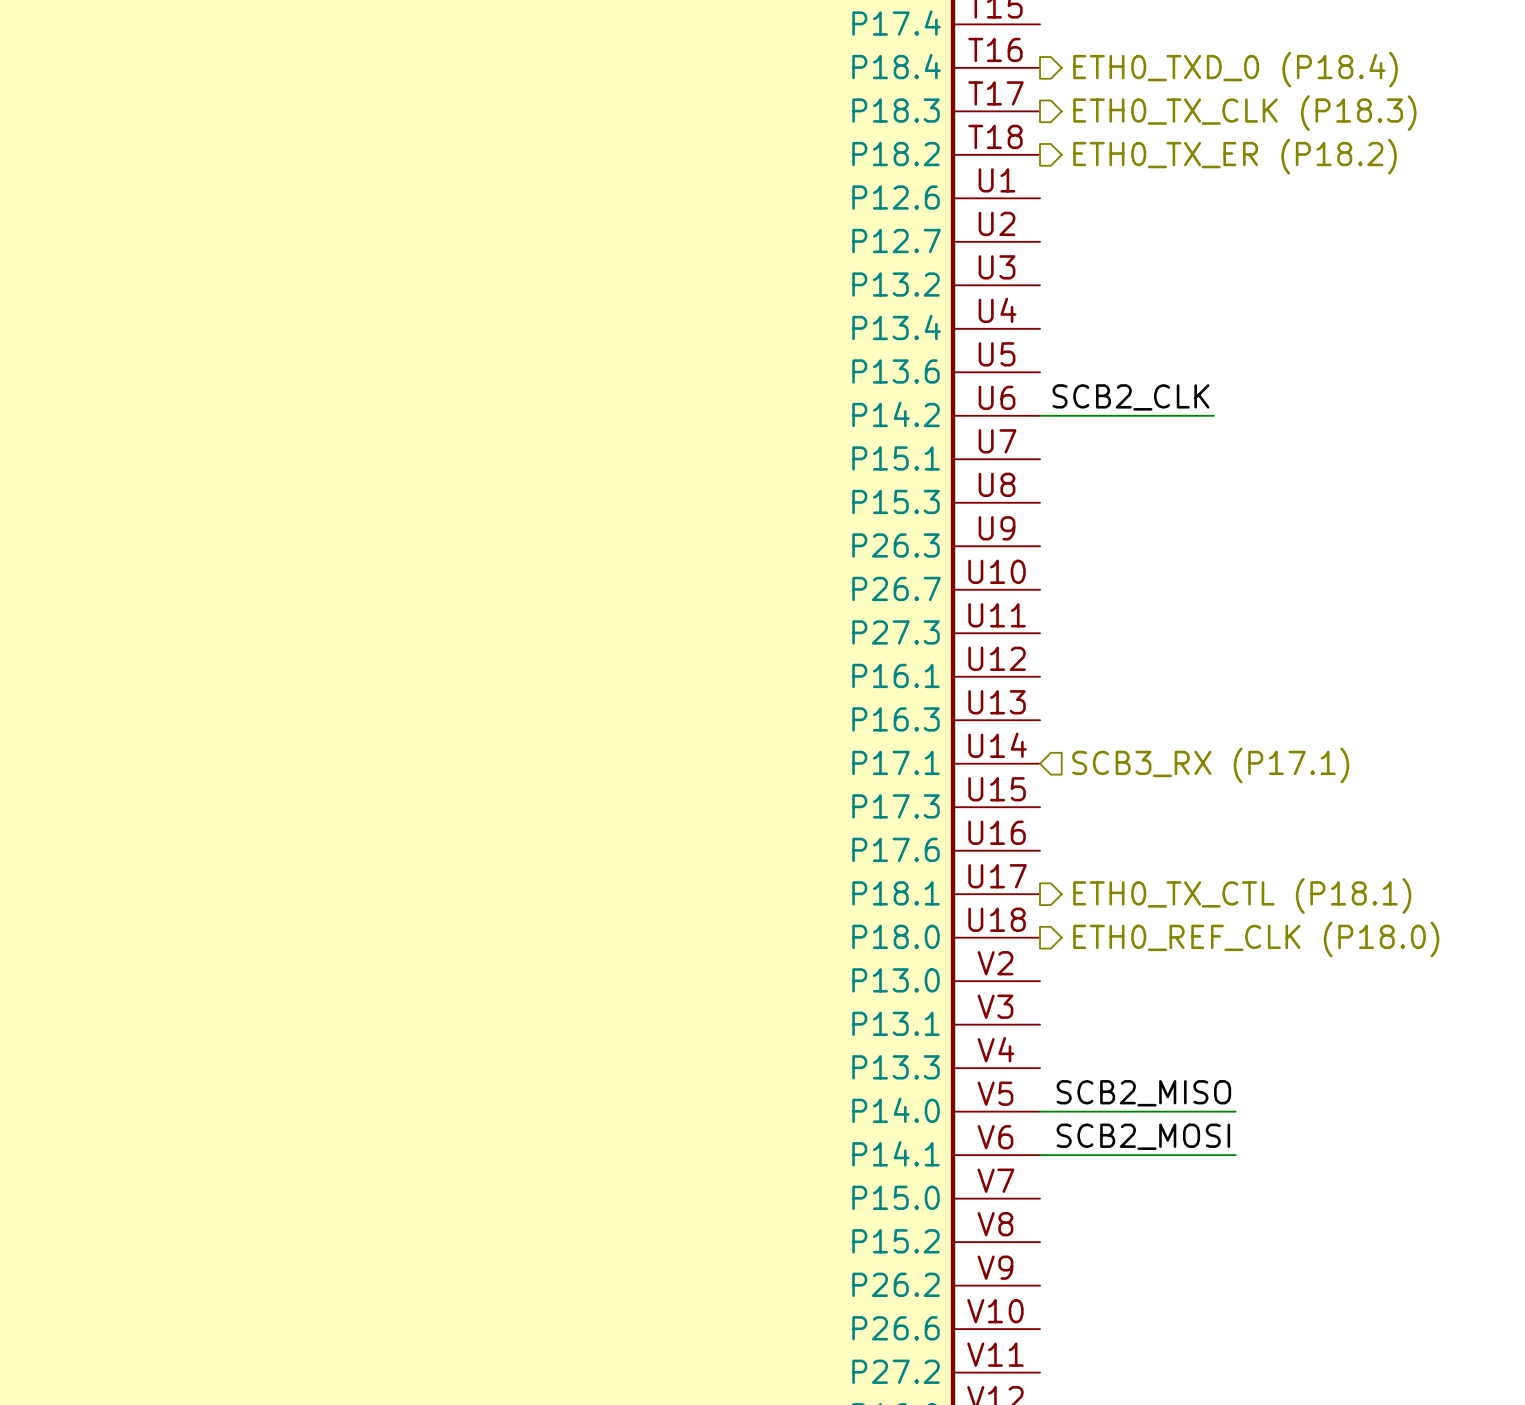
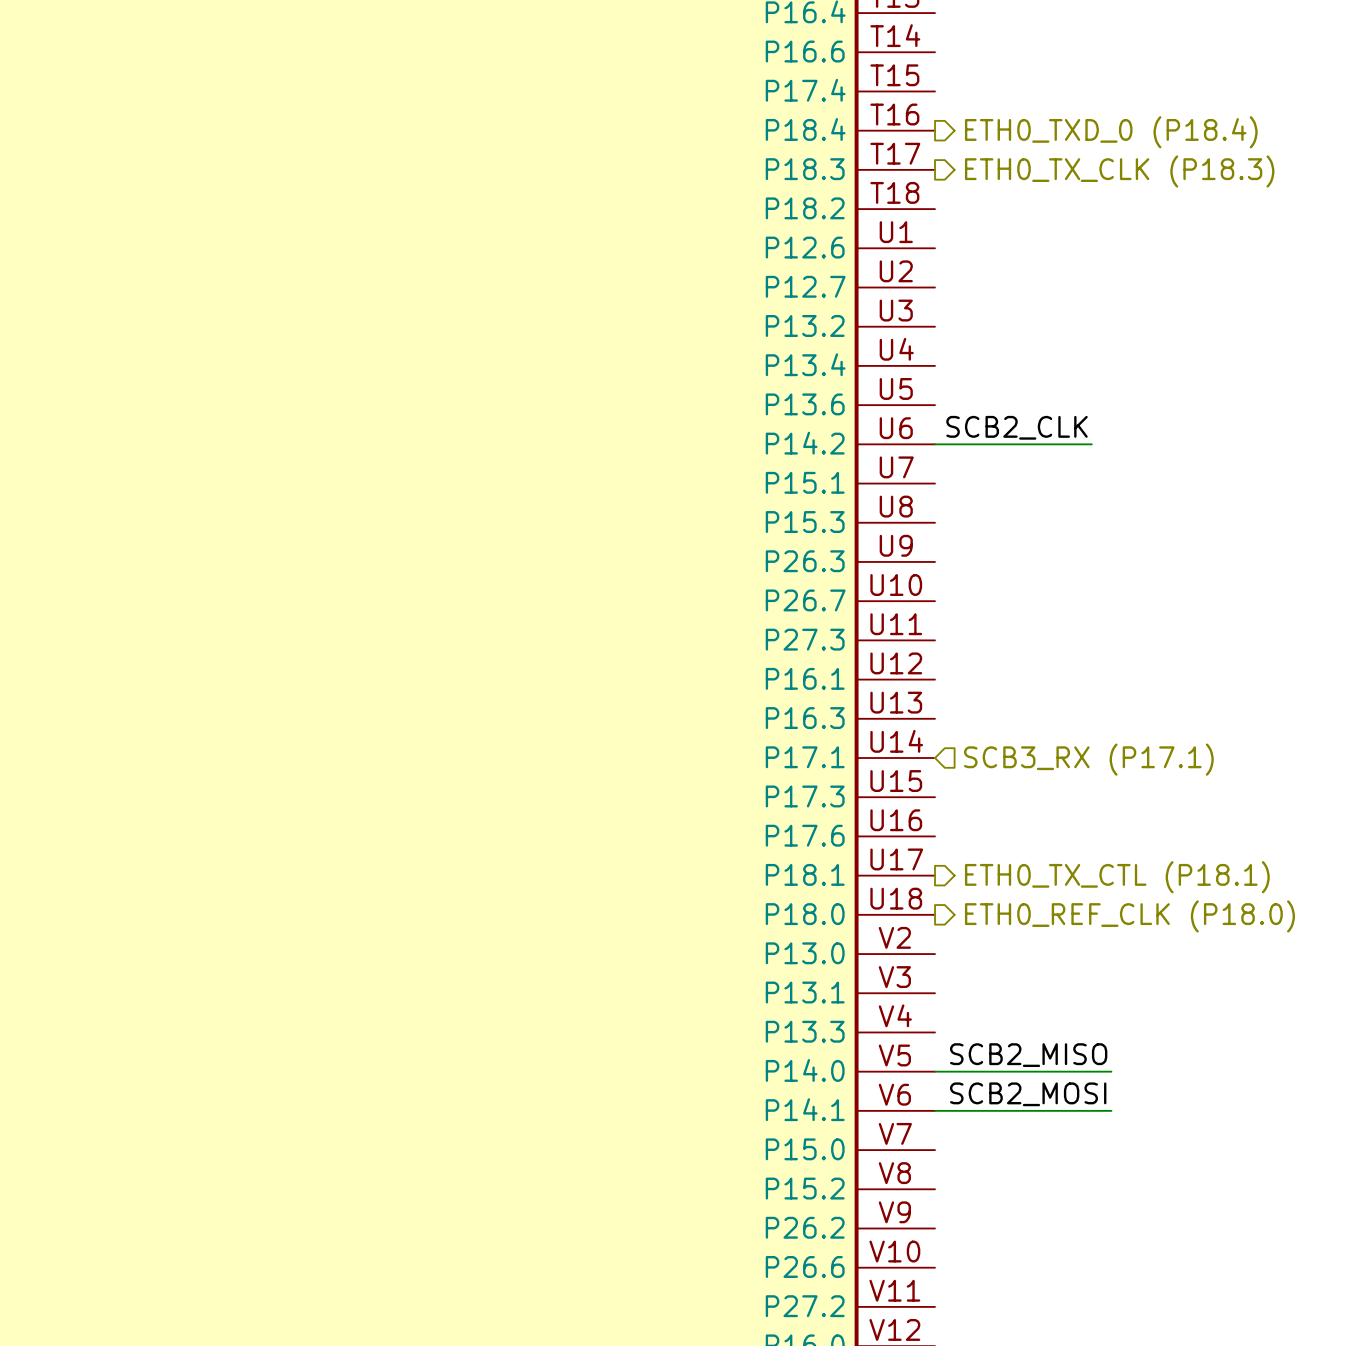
hierarchical label: ETH0_TX_ER (P18.2) (1235, 156) -> none

